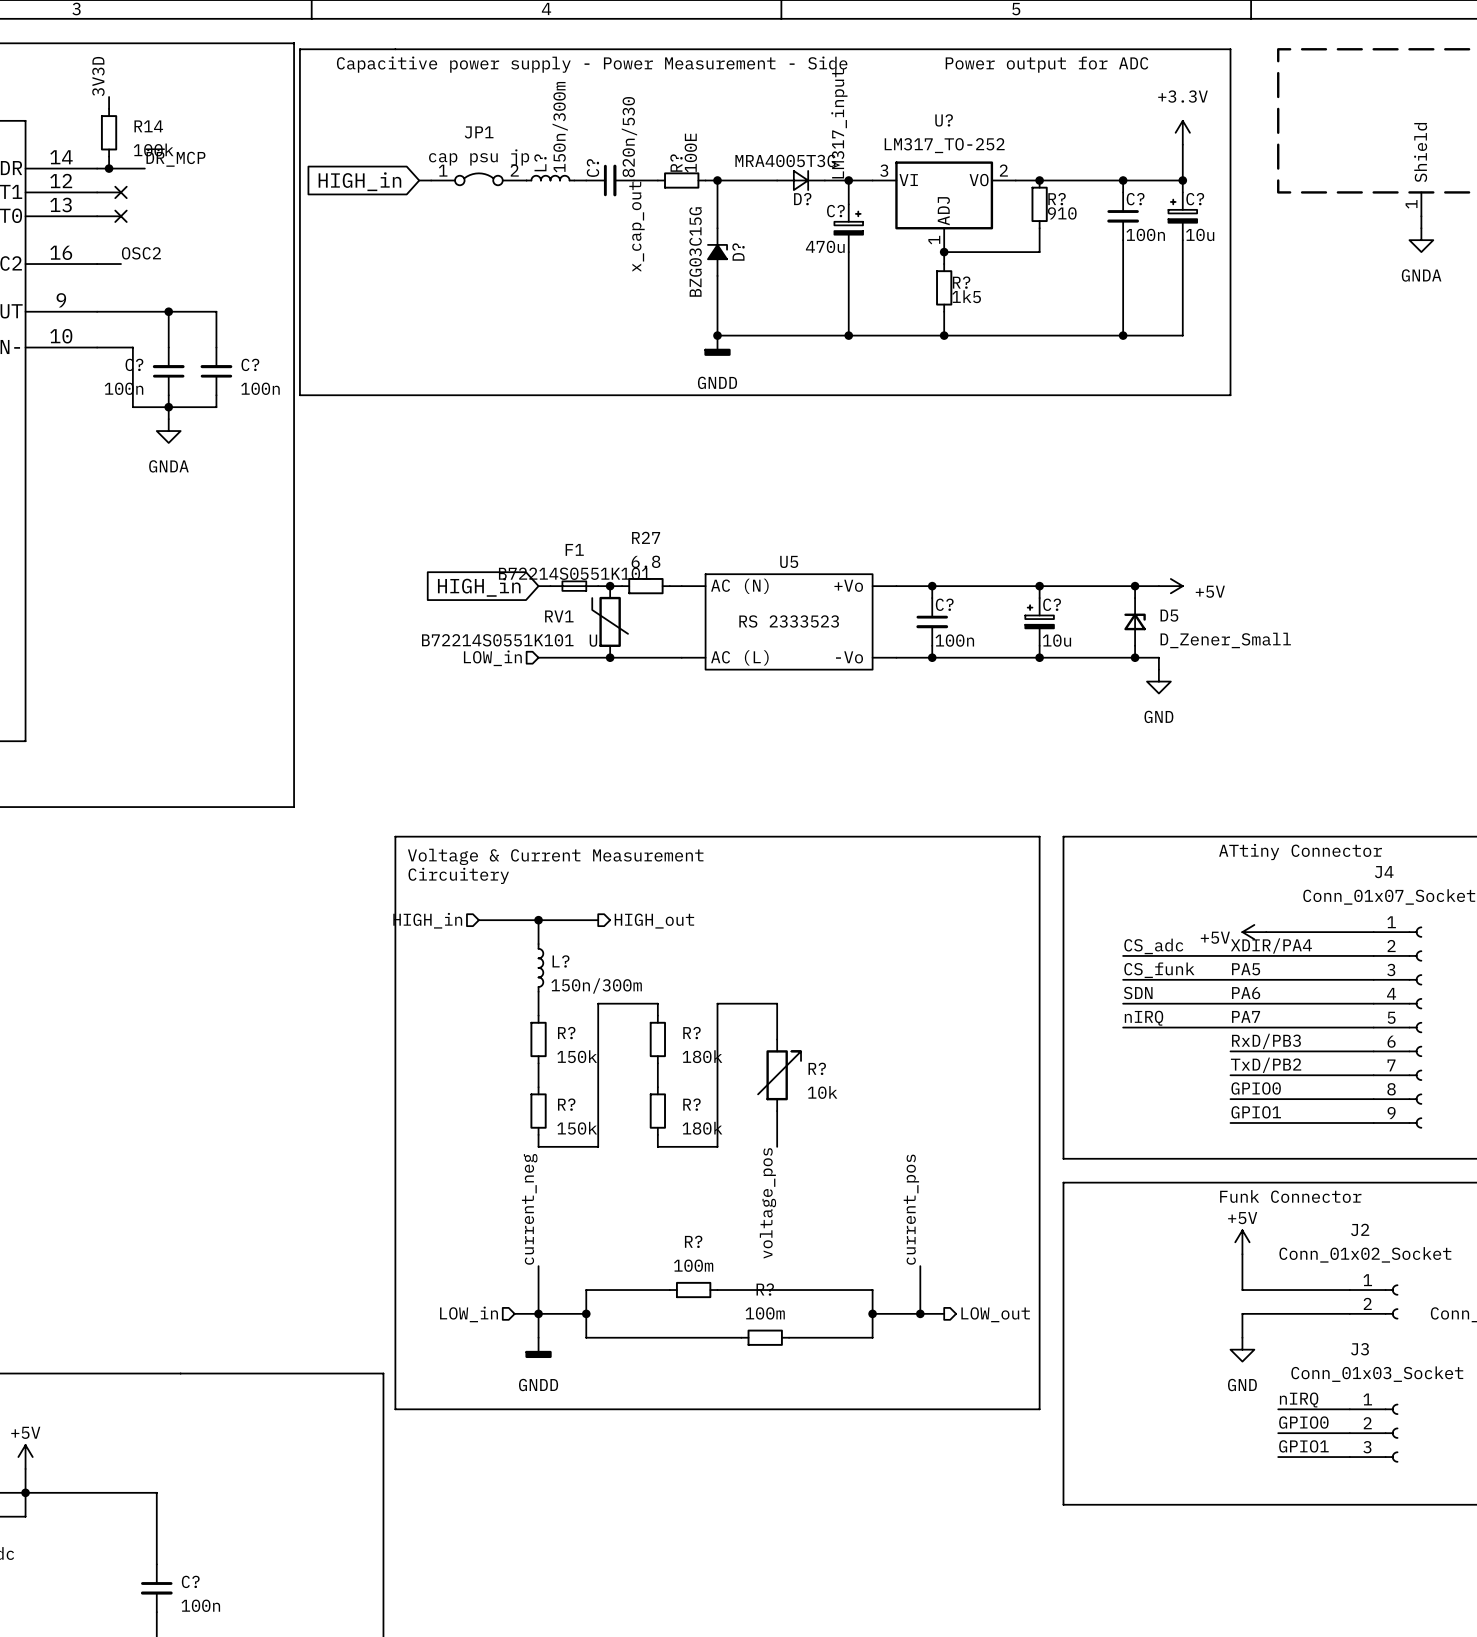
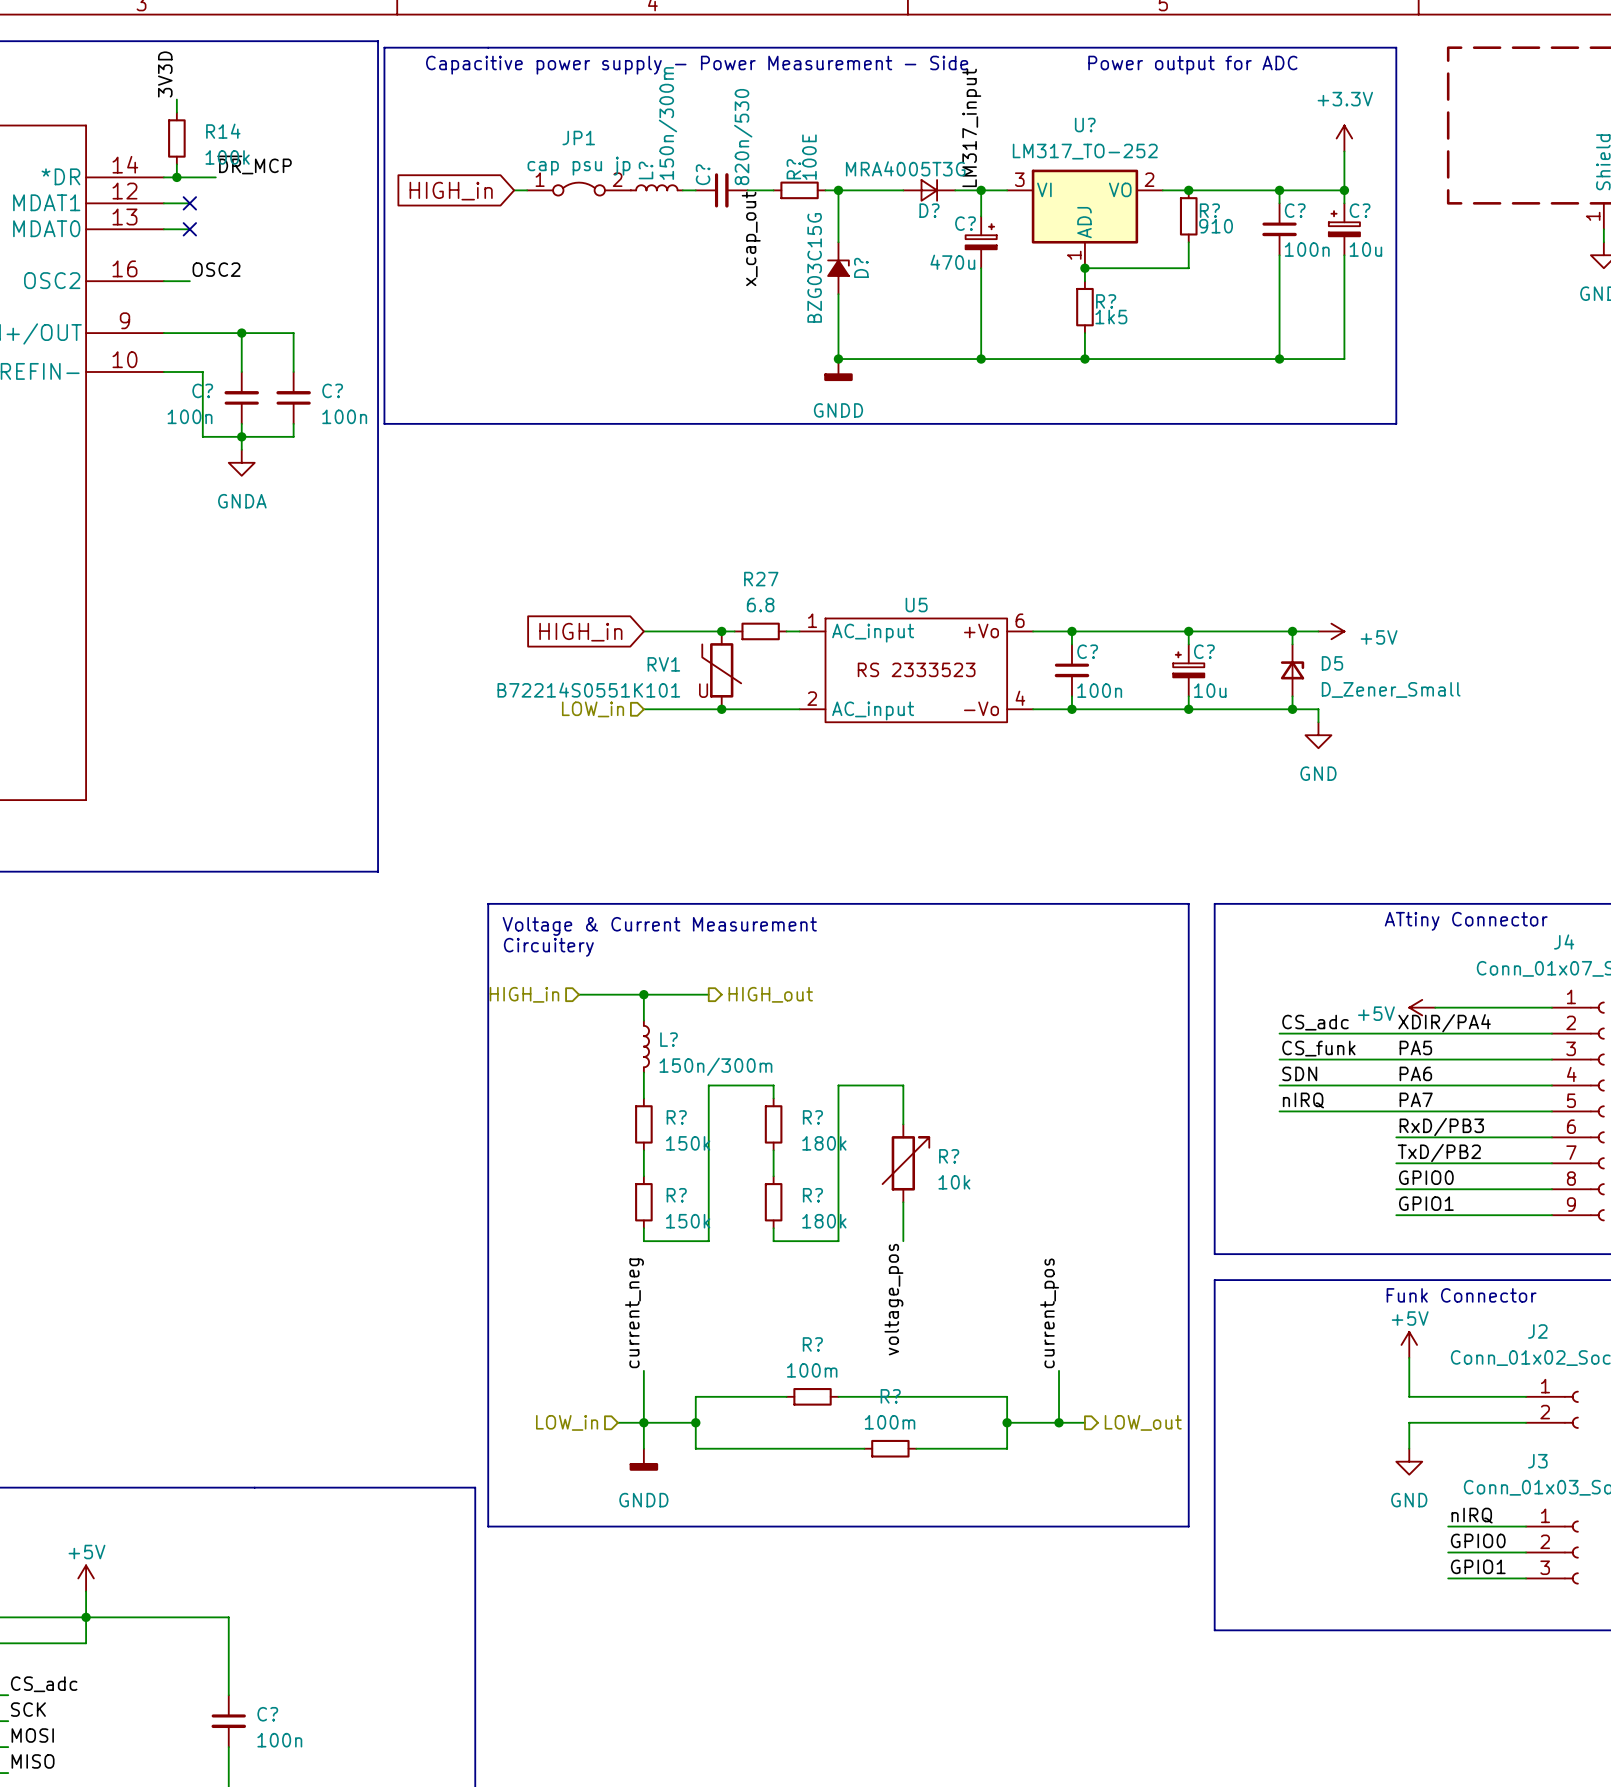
U5 pin number: none -> 1 (812, 620)
U5 pin number: none -> 6 (1020, 620)
F1: B72214S0551K101 (574, 586) -> none
U5 text: AC (N) (739, 586) -> none
U5 pin name: none -> AC_input (873, 633)
U5 pin number: none -> 2 (812, 698)
U5 pin number: none -> 4 (1020, 698)
U5 text: AC (L) (739, 657) -> none
U5 pin name: none -> AC_input (873, 710)

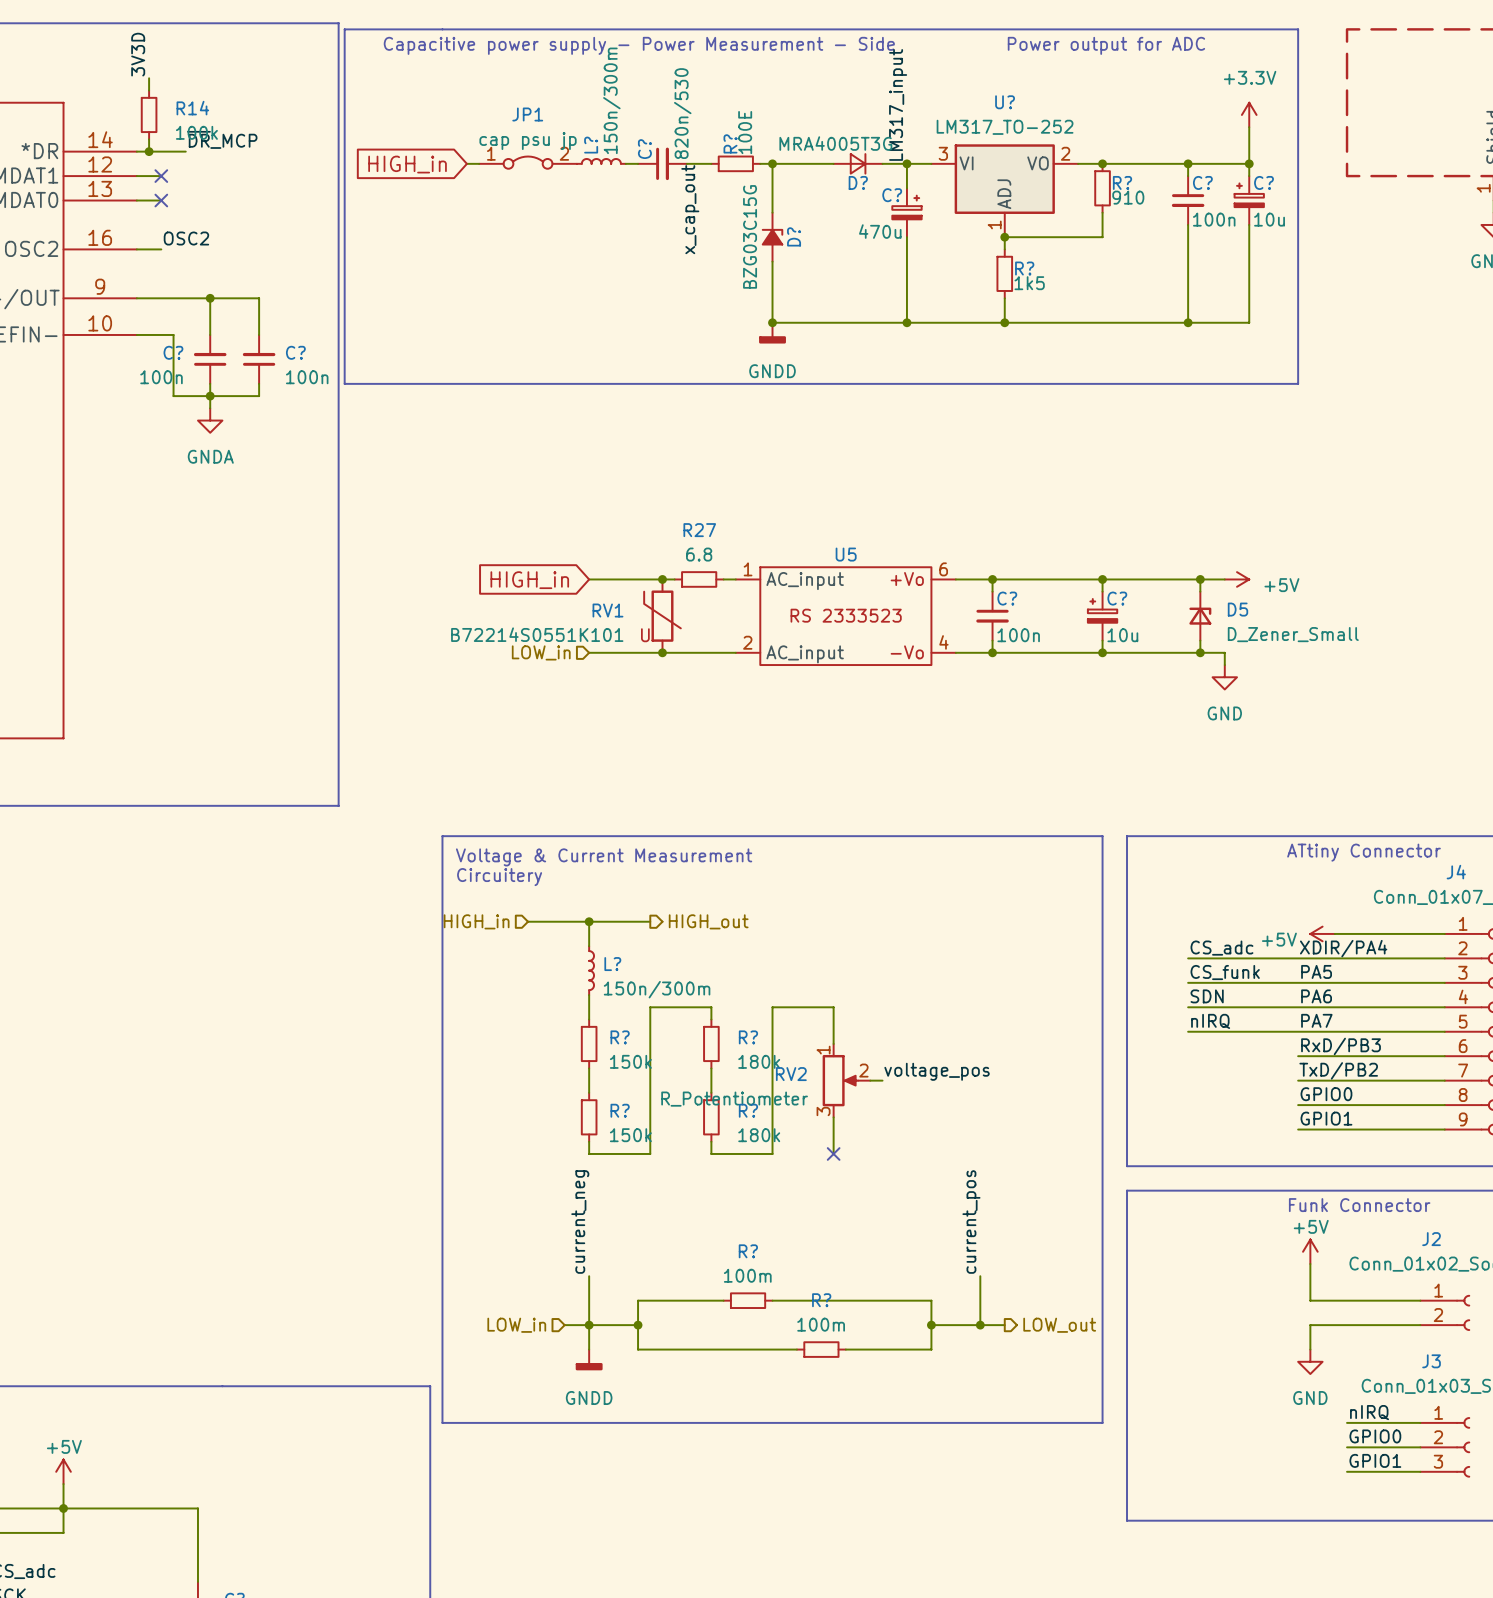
R?: 10k (905, 1163) -> none
RV2: none -> R_Potentiometer (846, 1080)
wire: none -> (870, 1080) (882, 1080)
no-connect mark: none -> (833, 1153)
label rotation: 0° (893, 1299) -> 90° clockwise (937, 1071)
label position: voltage_pos (893, 1299) -> voltage_pos (937, 1071)

